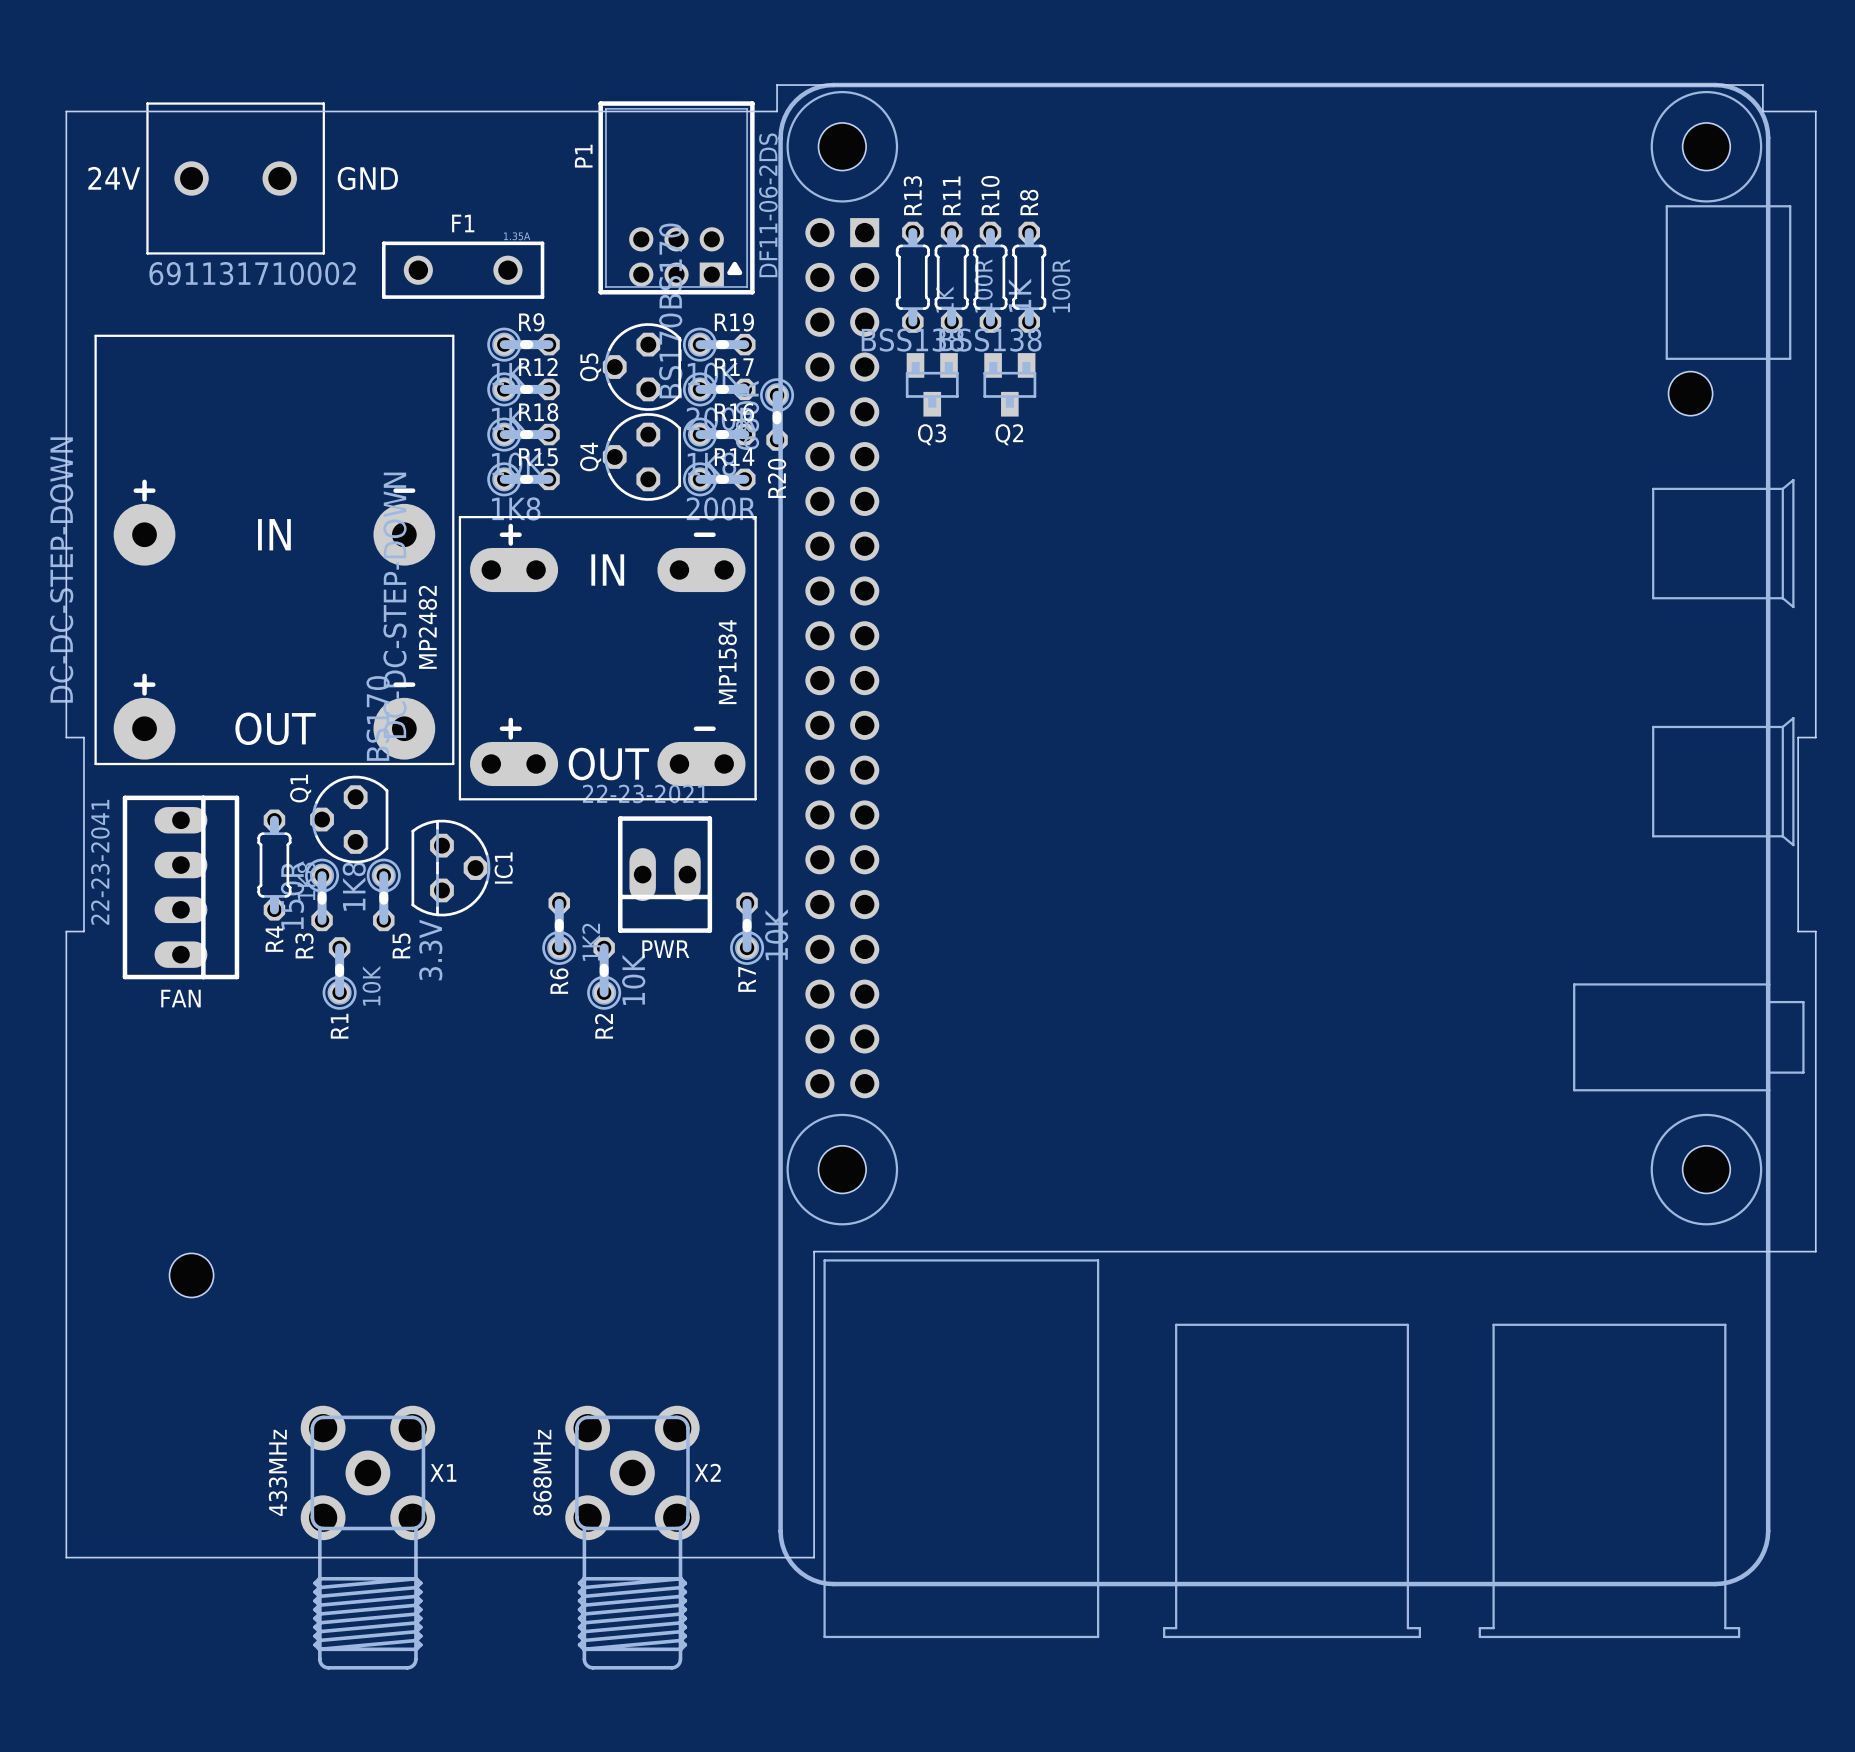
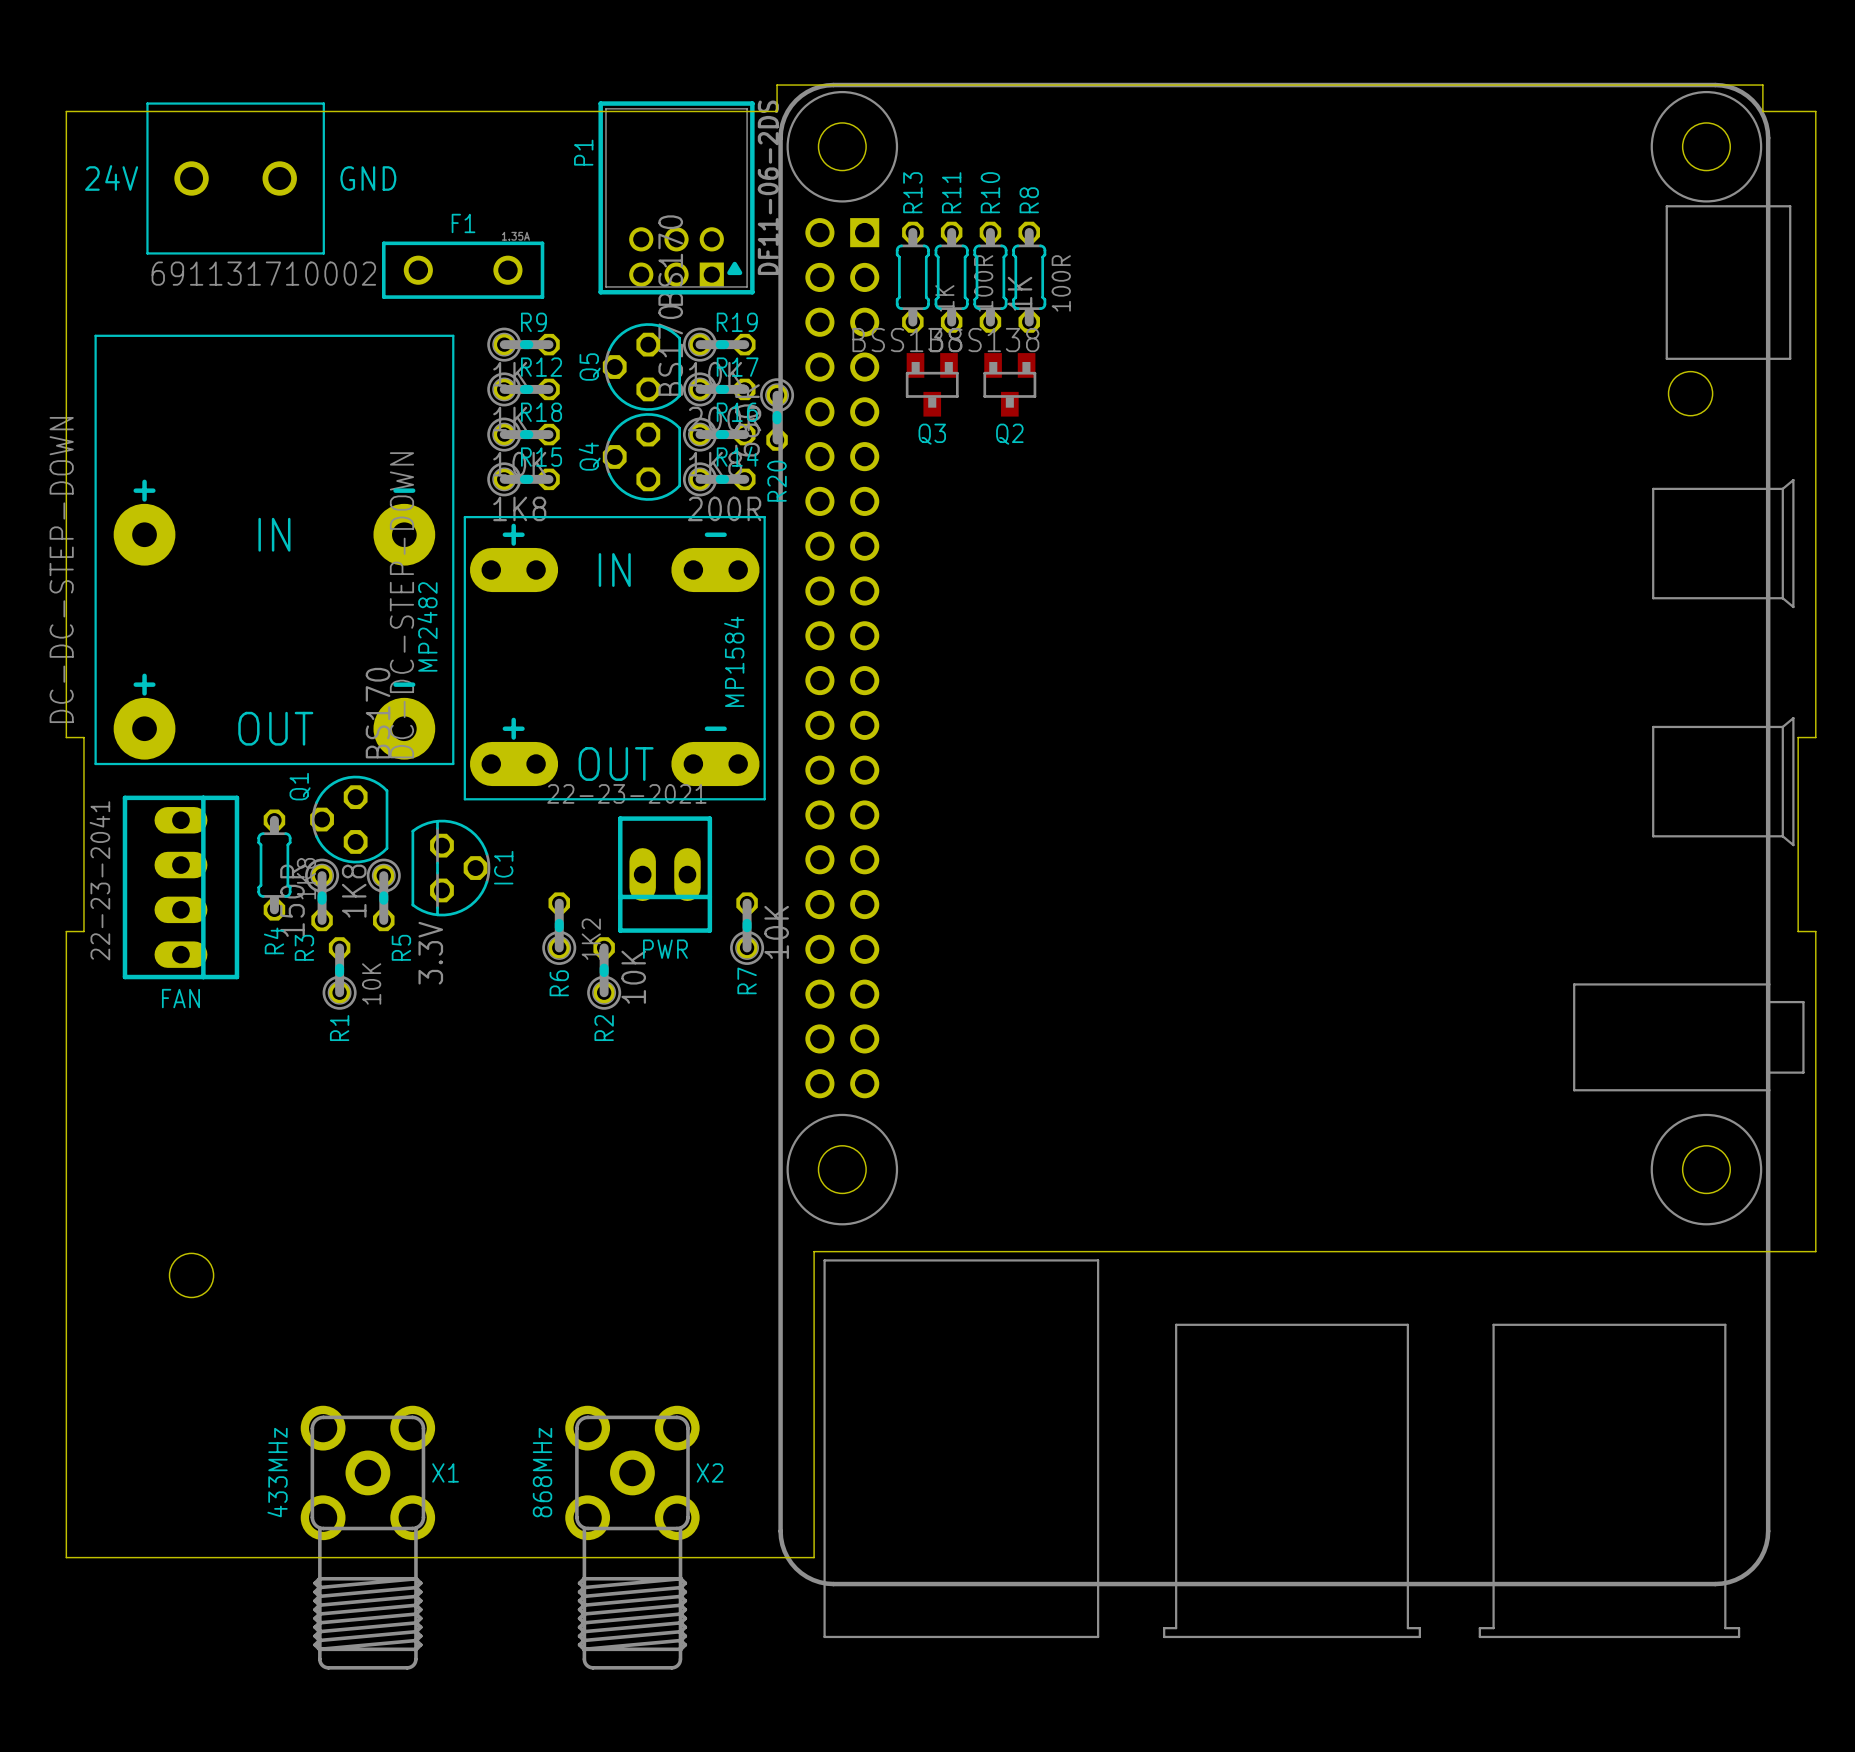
MP1584 footprint: [458, 515, 757, 801] -> [463, 515, 766, 801]

